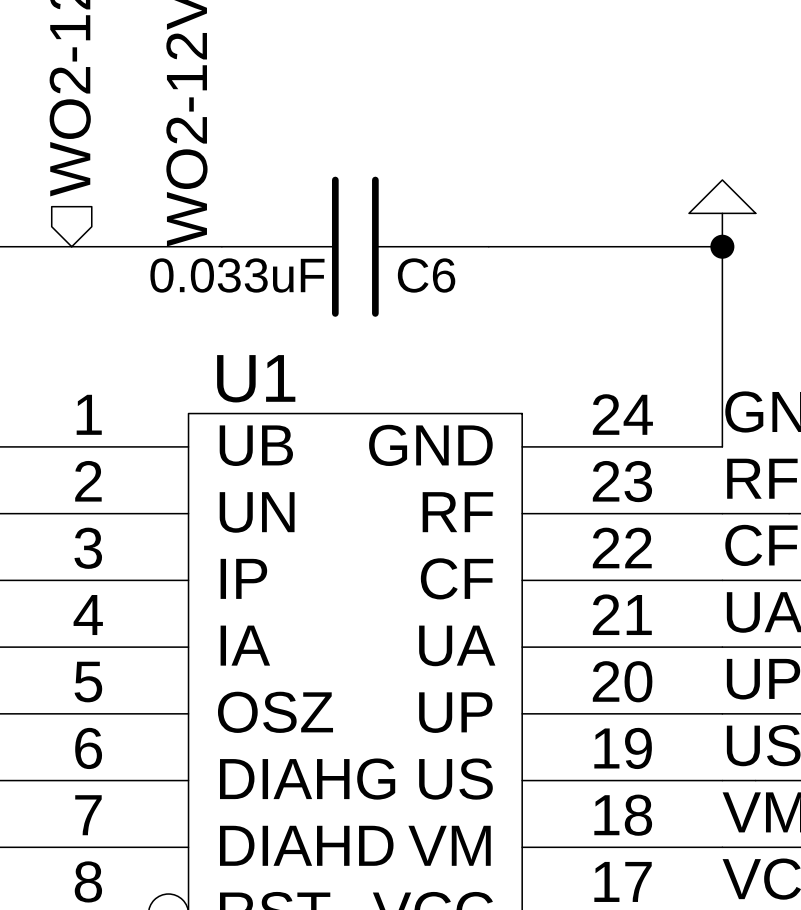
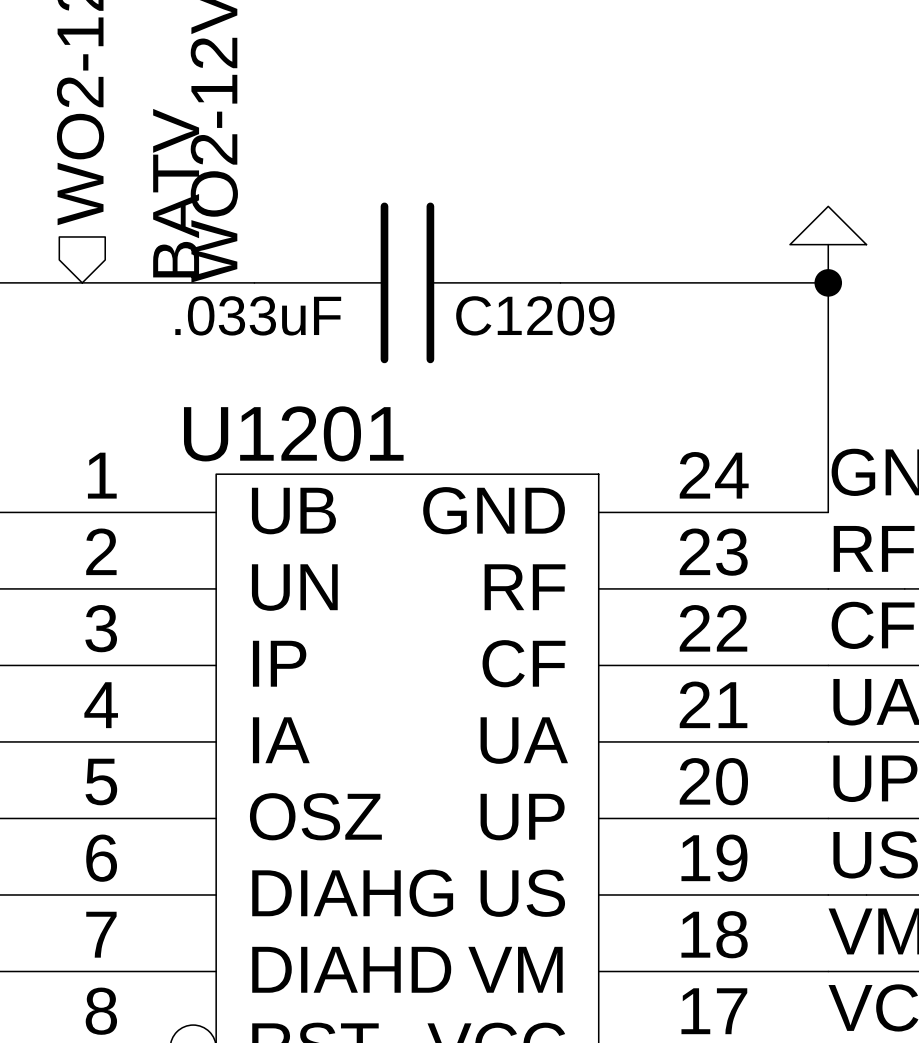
label: none -> BATV (176, 193)
C6 value: 0.033uF (237, 275) -> .033uF (258, 315)
C6 name: C6 (426, 275) -> C1209 (535, 315)
U1 name: U1 (256, 378) -> U1201 (293, 433)

